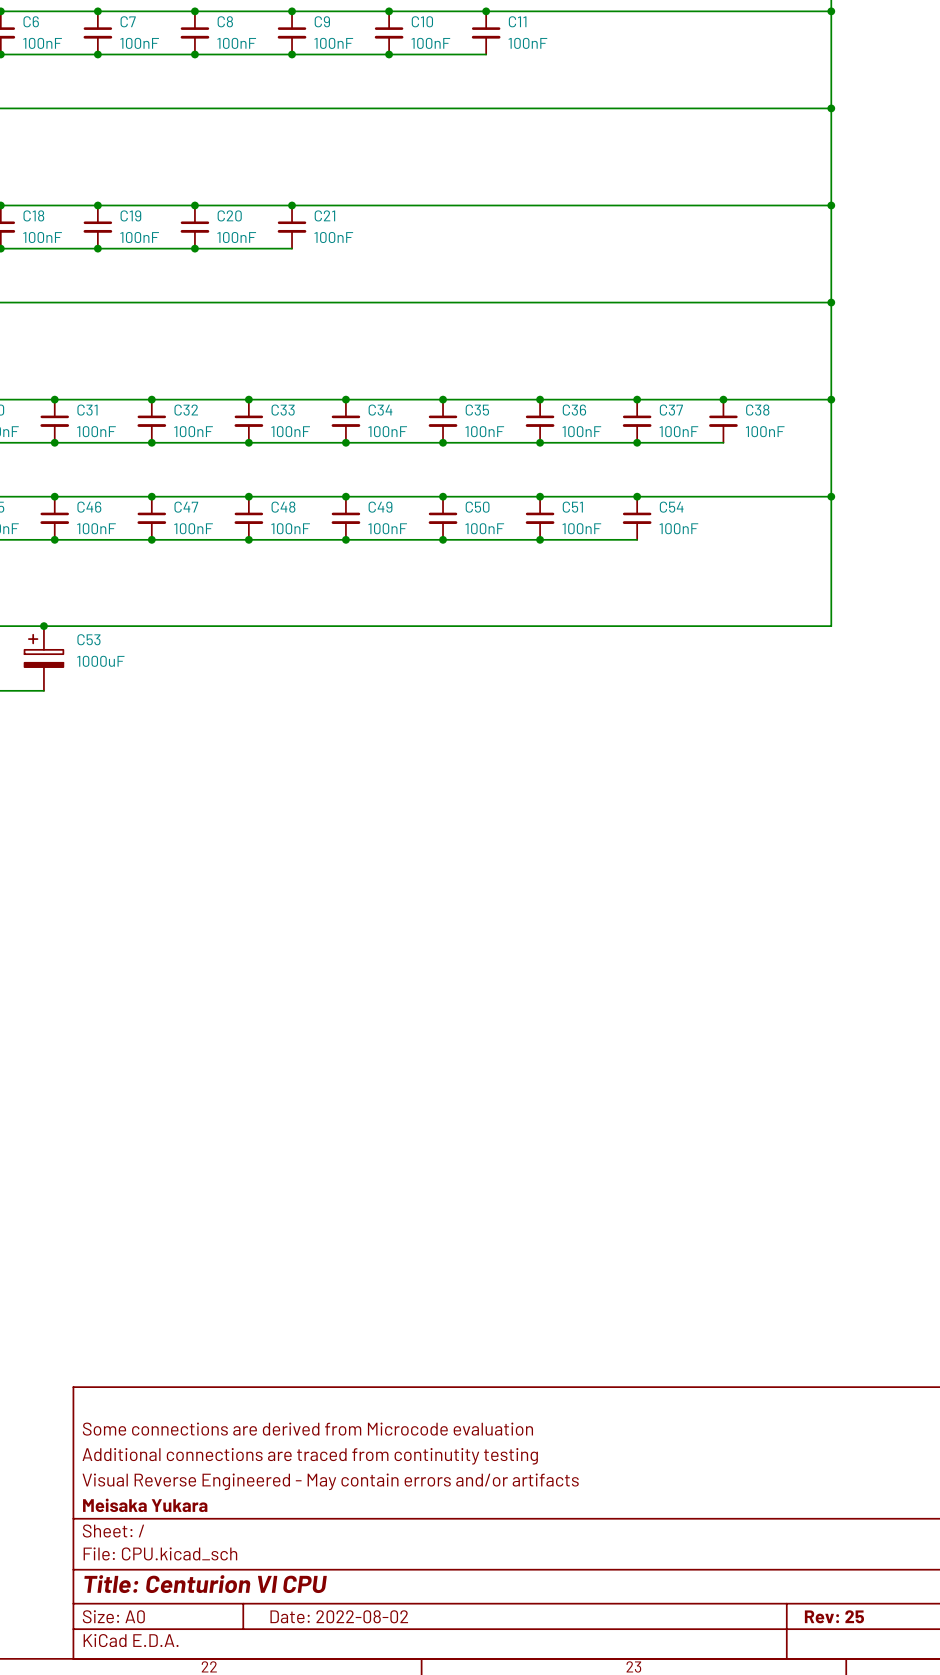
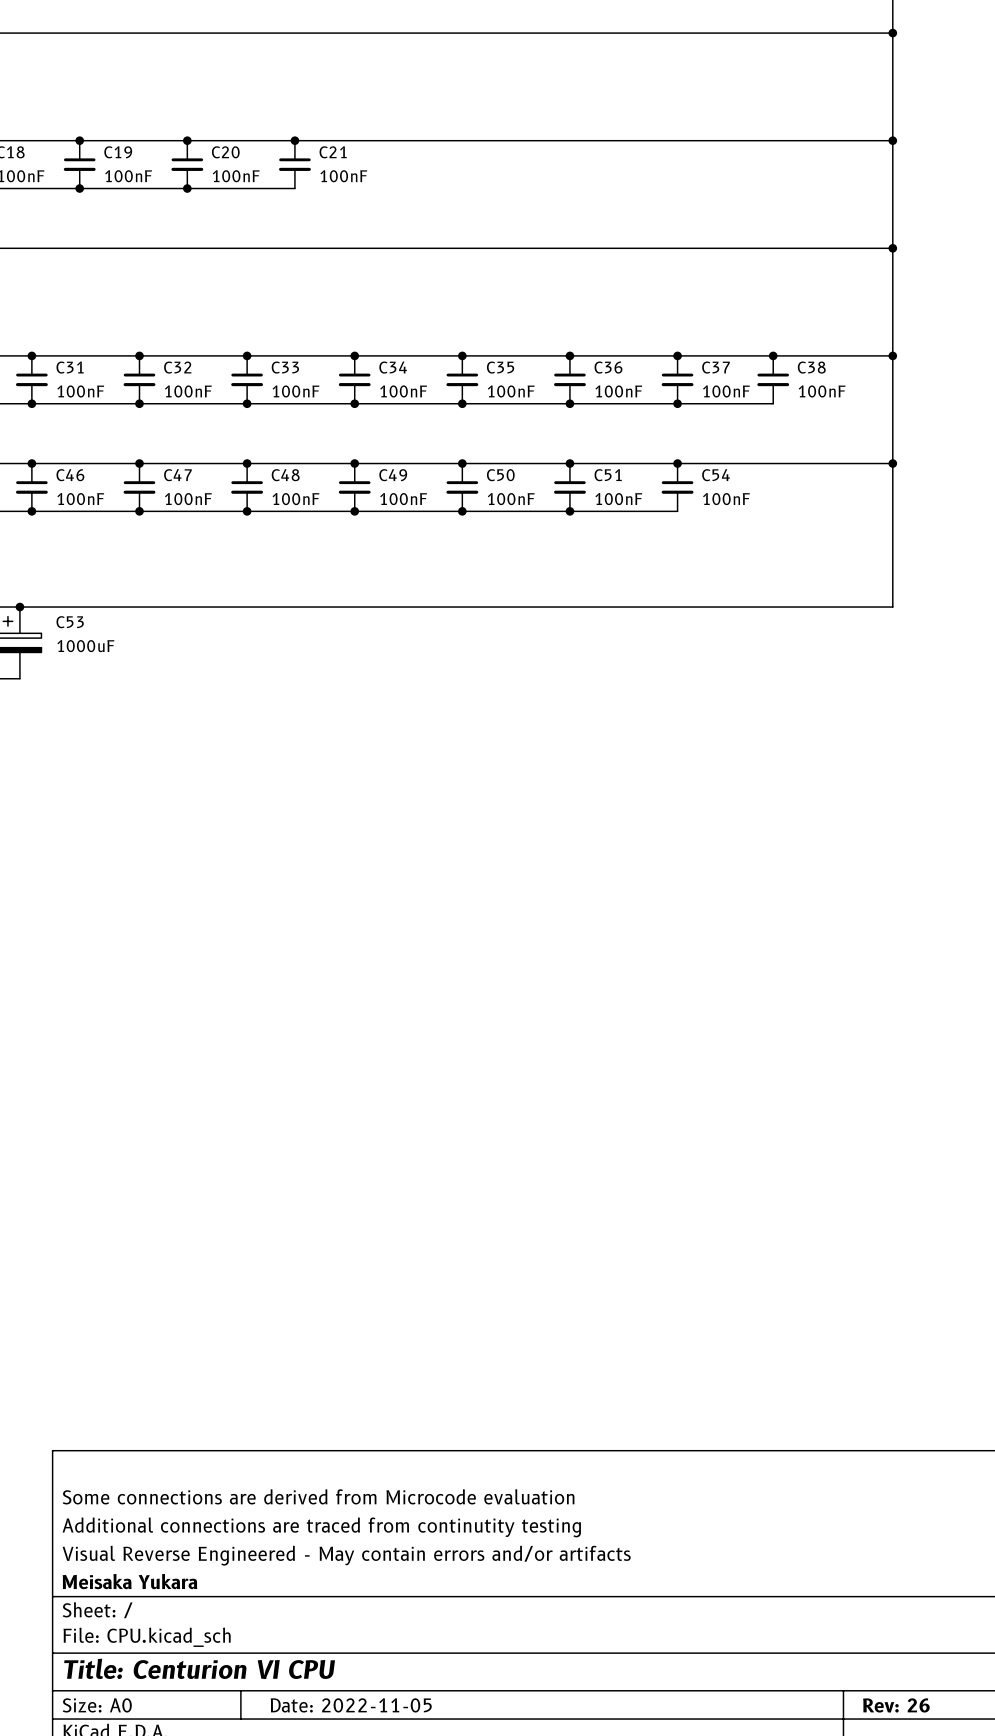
title block: Date: 2022-08-02 (339, 1616) -> Date: 2022-11-05 (351, 1705)
title block: Rev: 25 (834, 1616) -> Rev: 26 (896, 1705)

